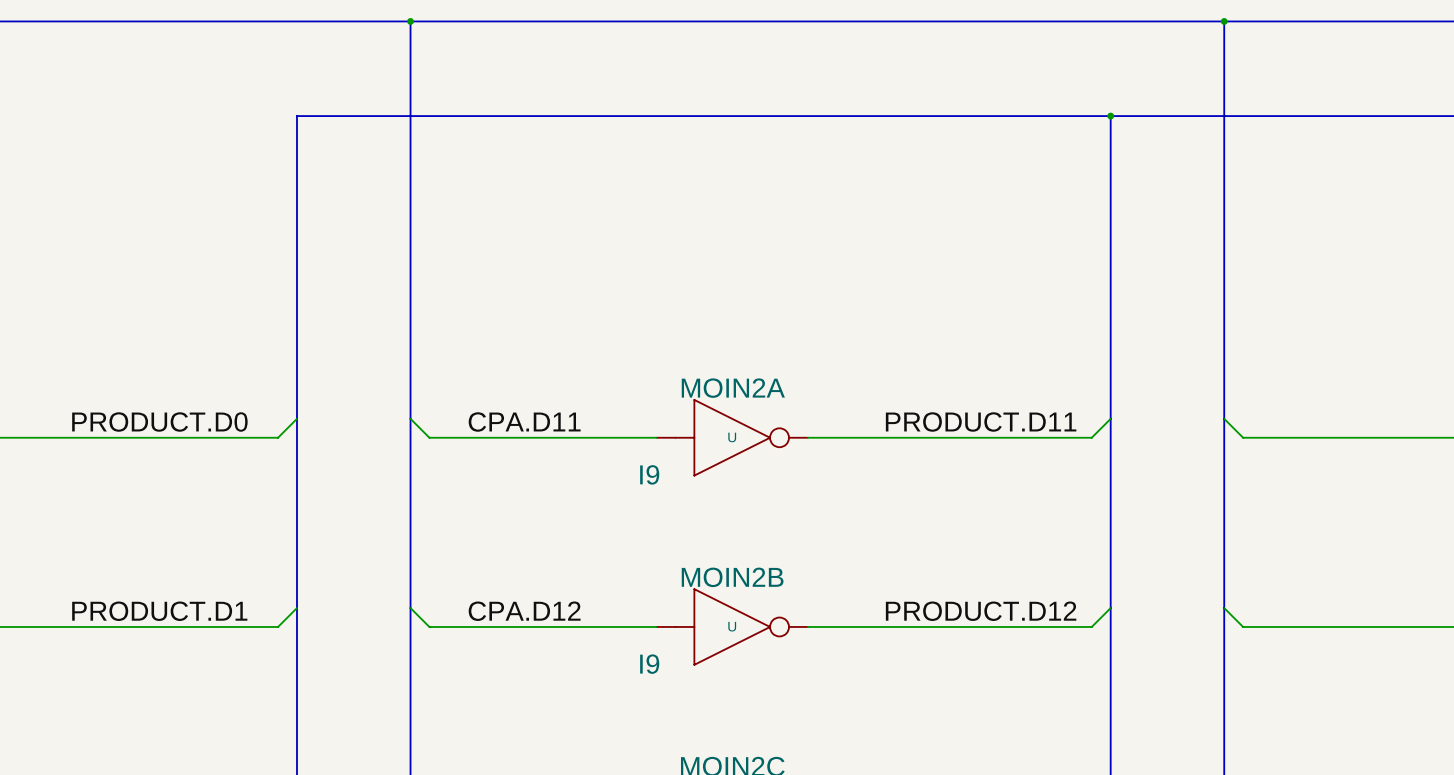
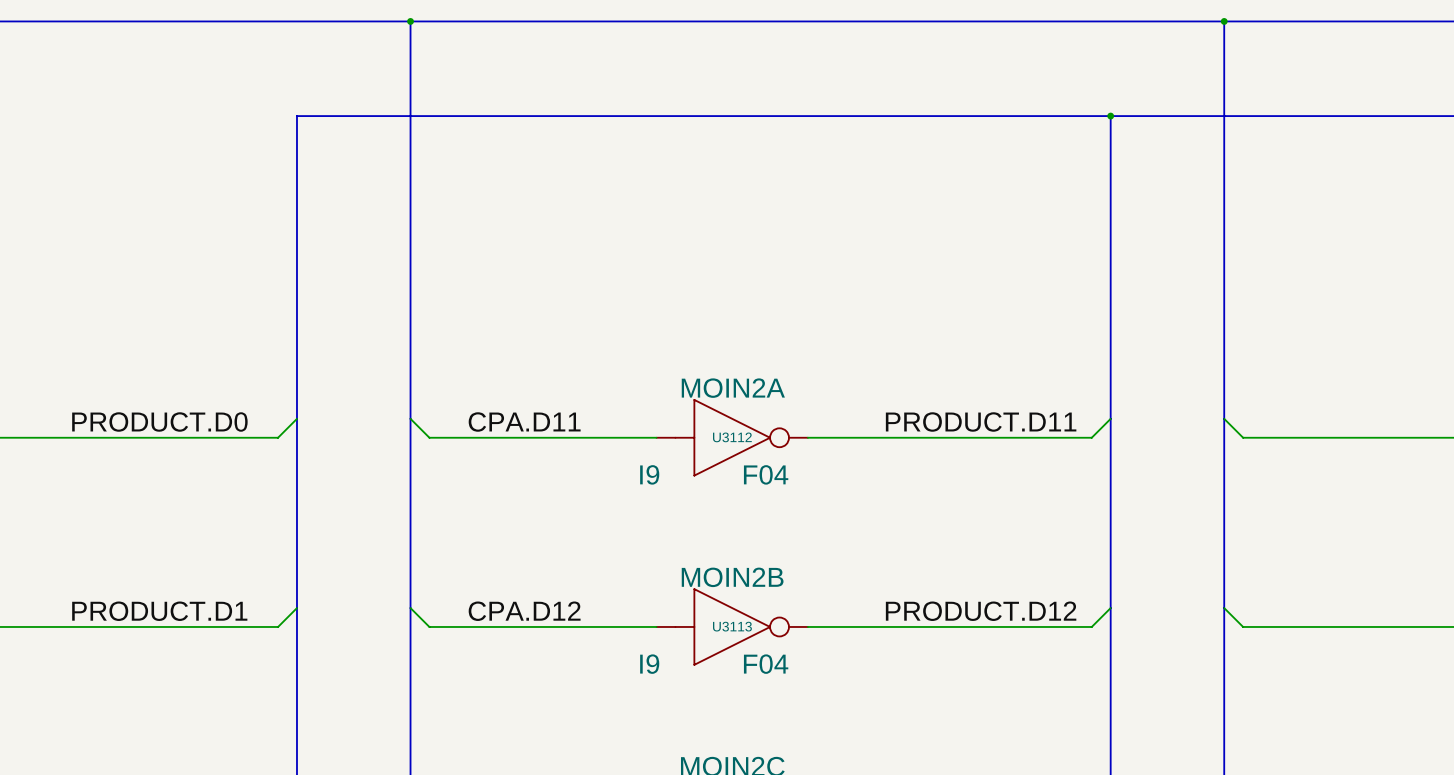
U name: U (732, 437) -> U3112 (732, 437)
U value: none -> F04 (766, 474)
U name: U (732, 626) -> U3113 (732, 626)
U value: none -> F04 (766, 664)

